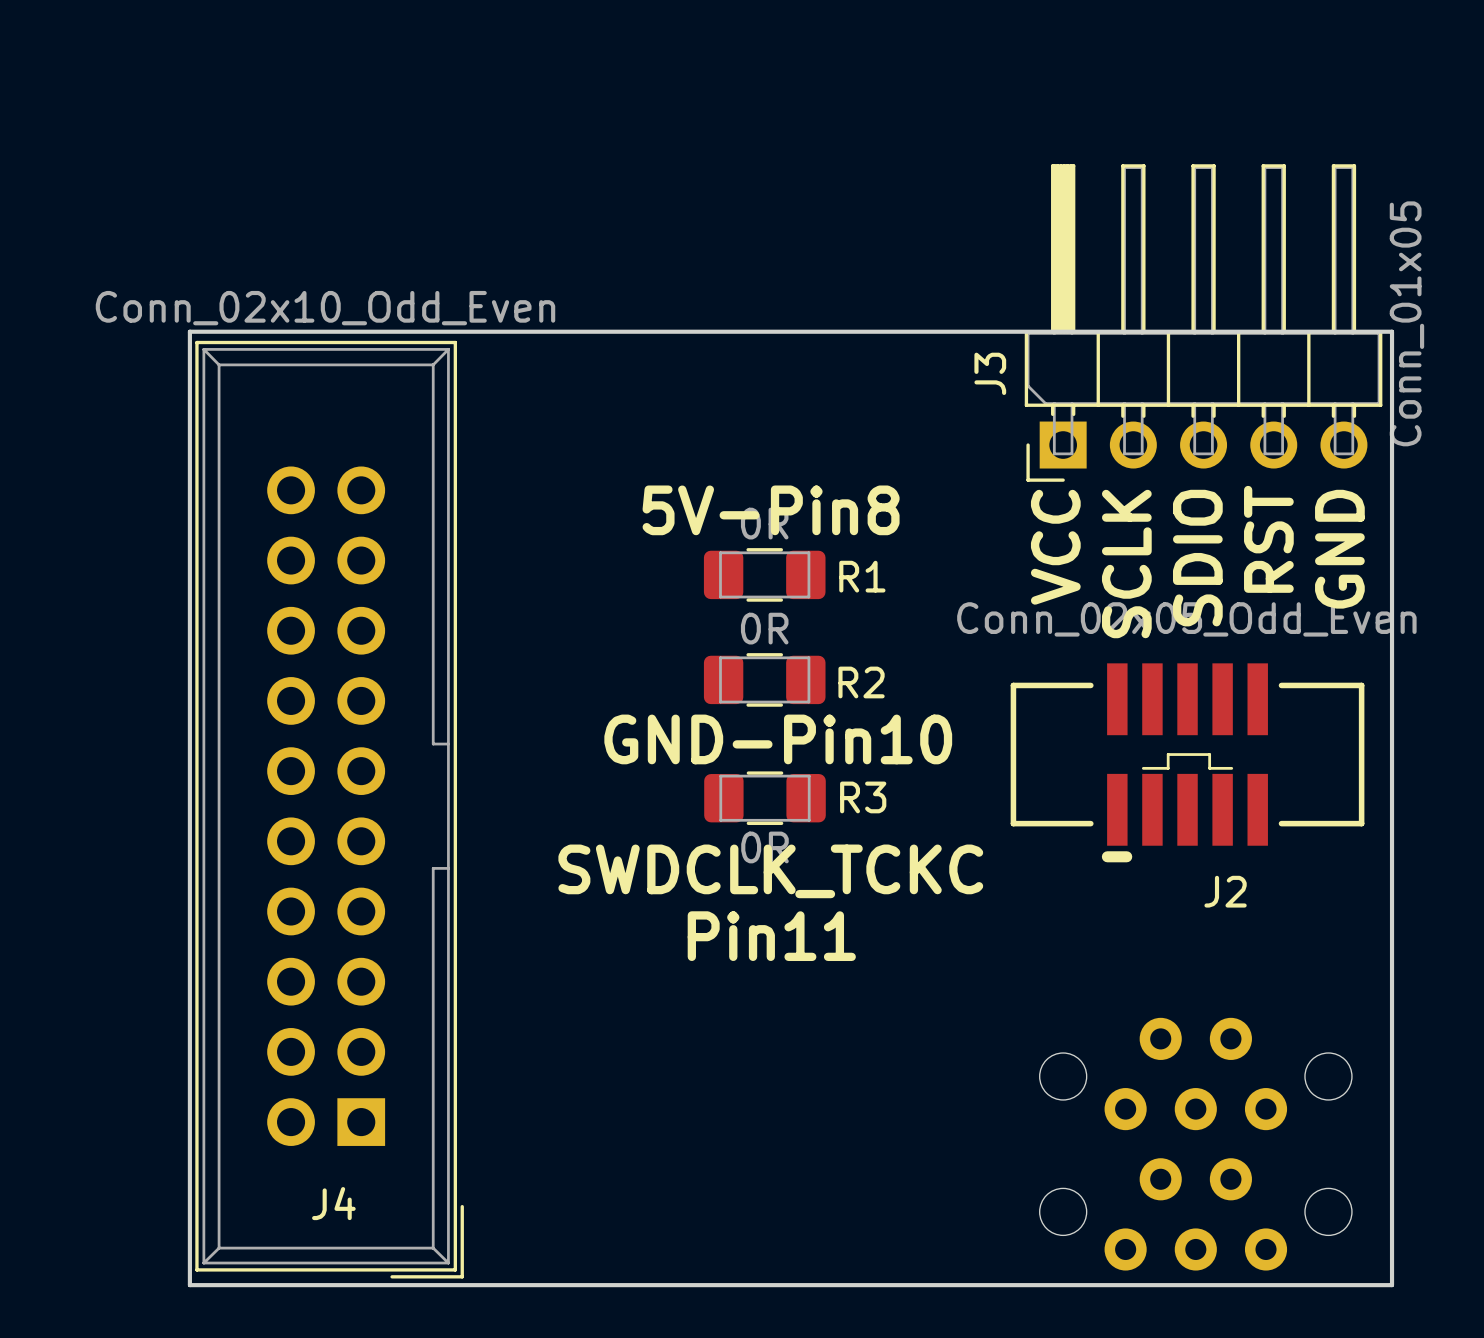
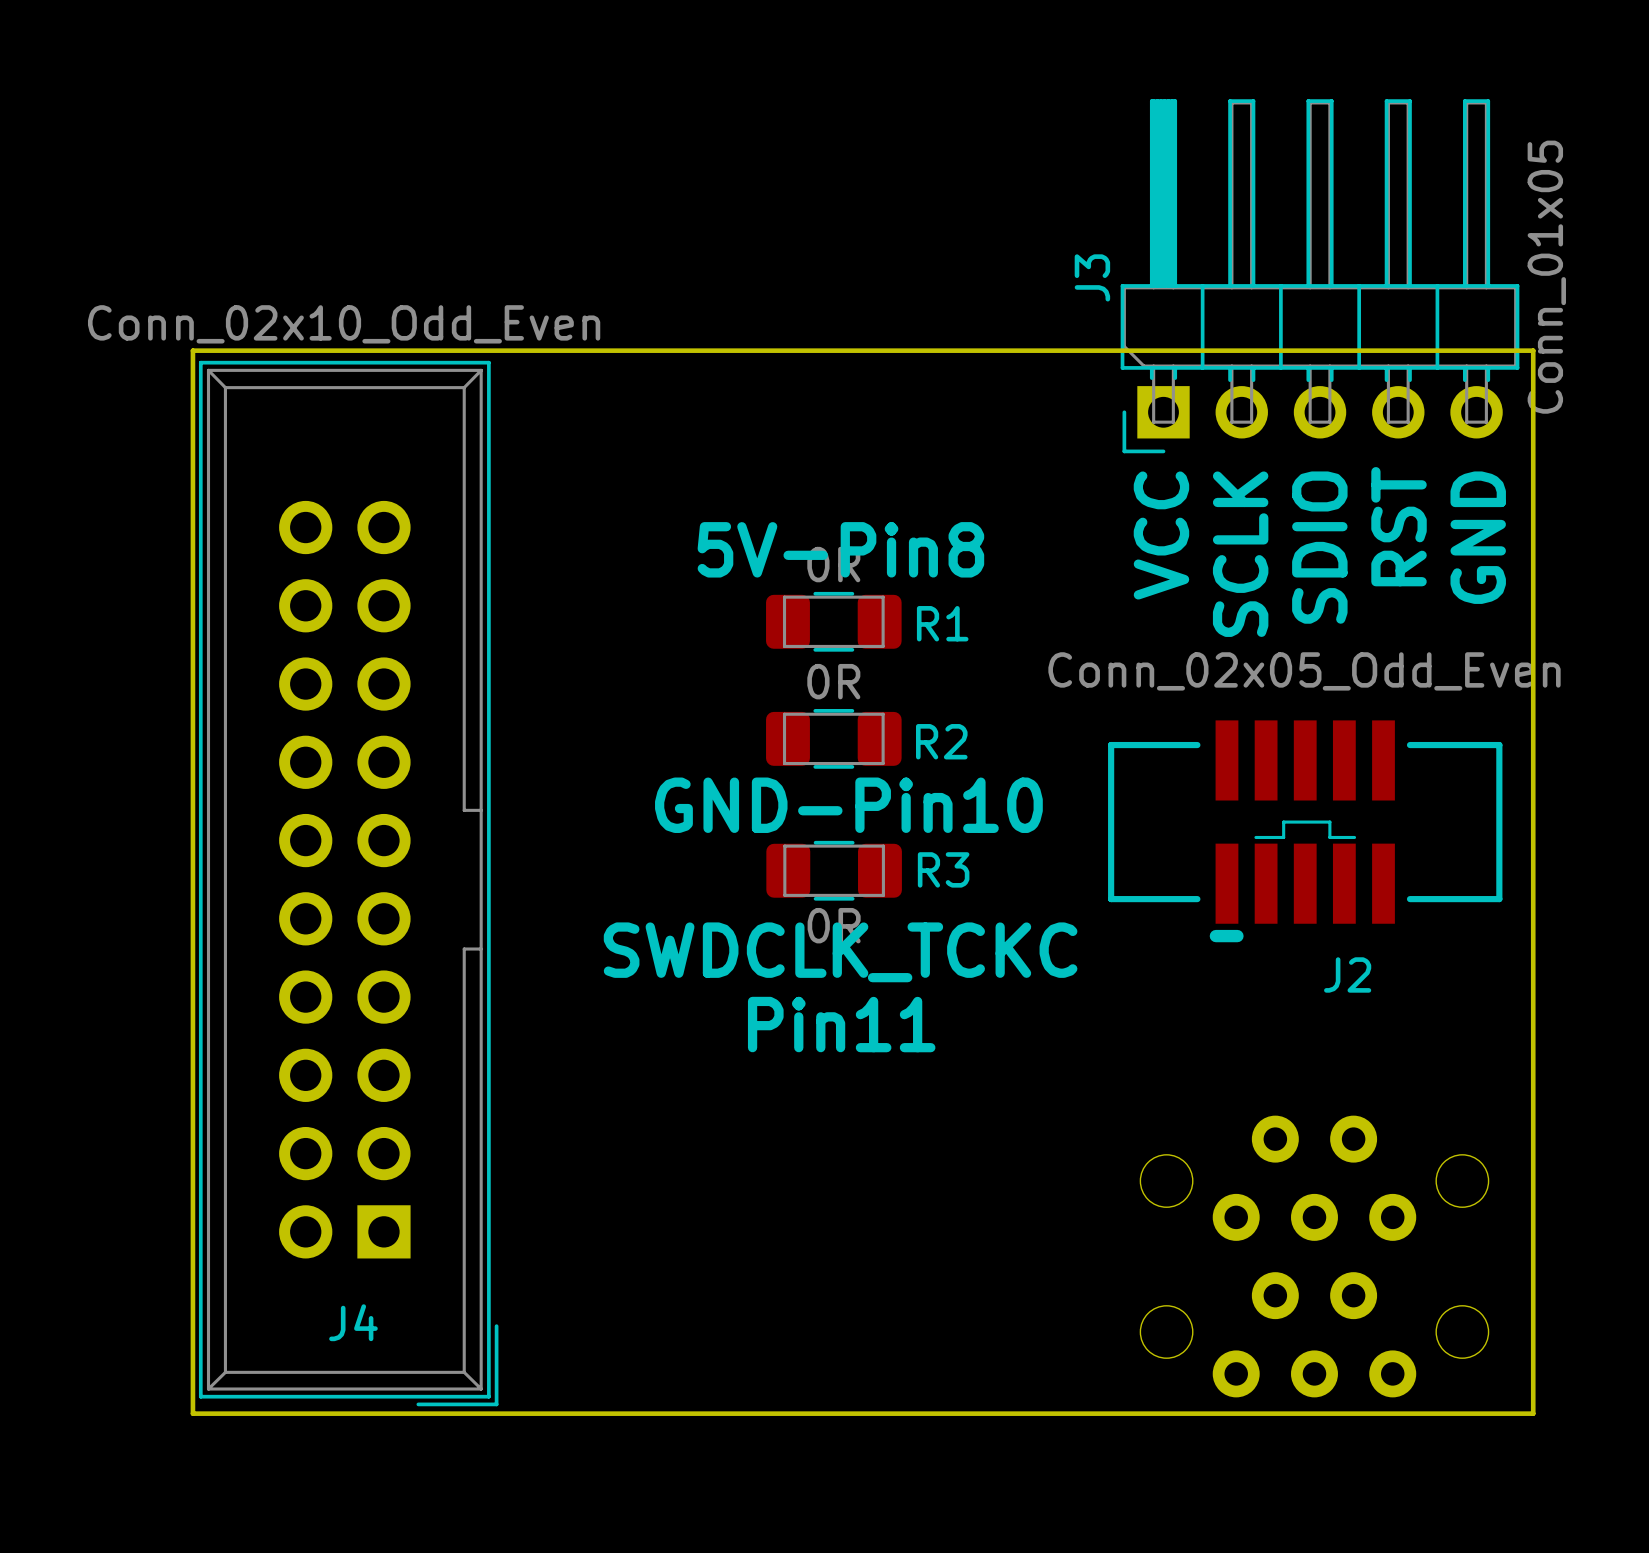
J3 position: (1203, 323) -> (1320, 276)
J3 name position: J3 (990, 373) -> J3 (1092, 277)
text position: RST (1268, 539) -> RST (1399, 526)
text position: VCC (1055, 547) -> VCC (1161, 535)
text position: GND (1339, 549) -> GND (1478, 537)
text position: SDIO (1197, 558) -> SDIO (1319, 547)
text position: SCLK (1126, 564) -> SCLK (1240, 554)

